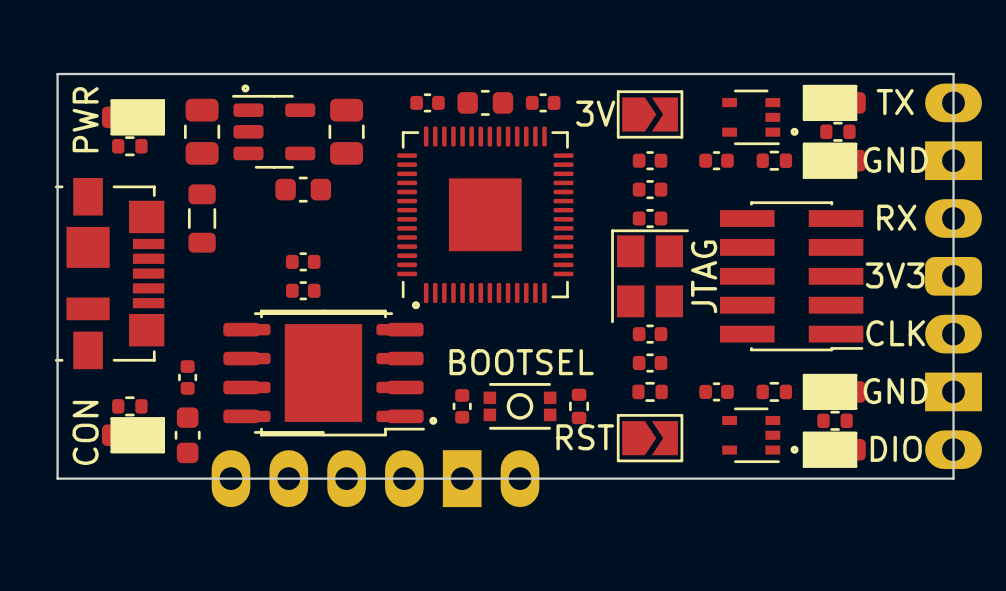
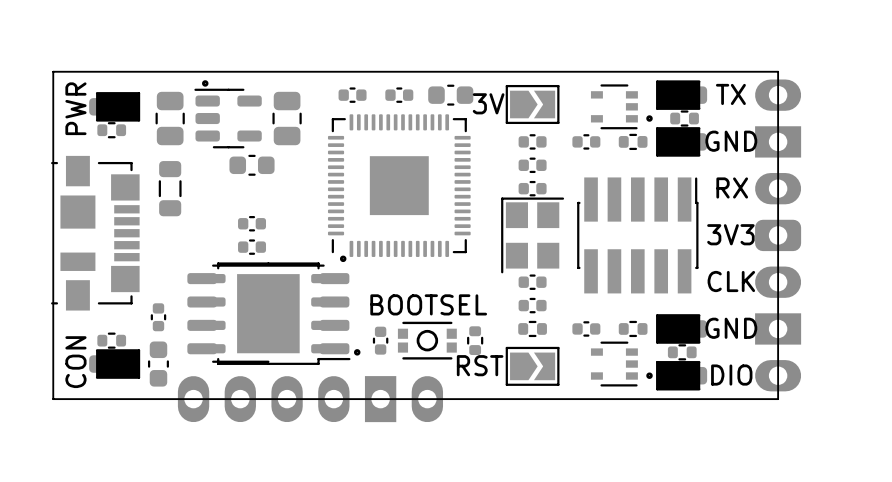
part footprint: [457, 89, 514, 116] -> [385, 87, 414, 103]
part footprint: [525, 93, 561, 113] -> [428, 84, 474, 106]
text: JTAG (704, 276) -> none
part rotation: 0° (791, 276) -> 90° counterclockwise (637, 235)

